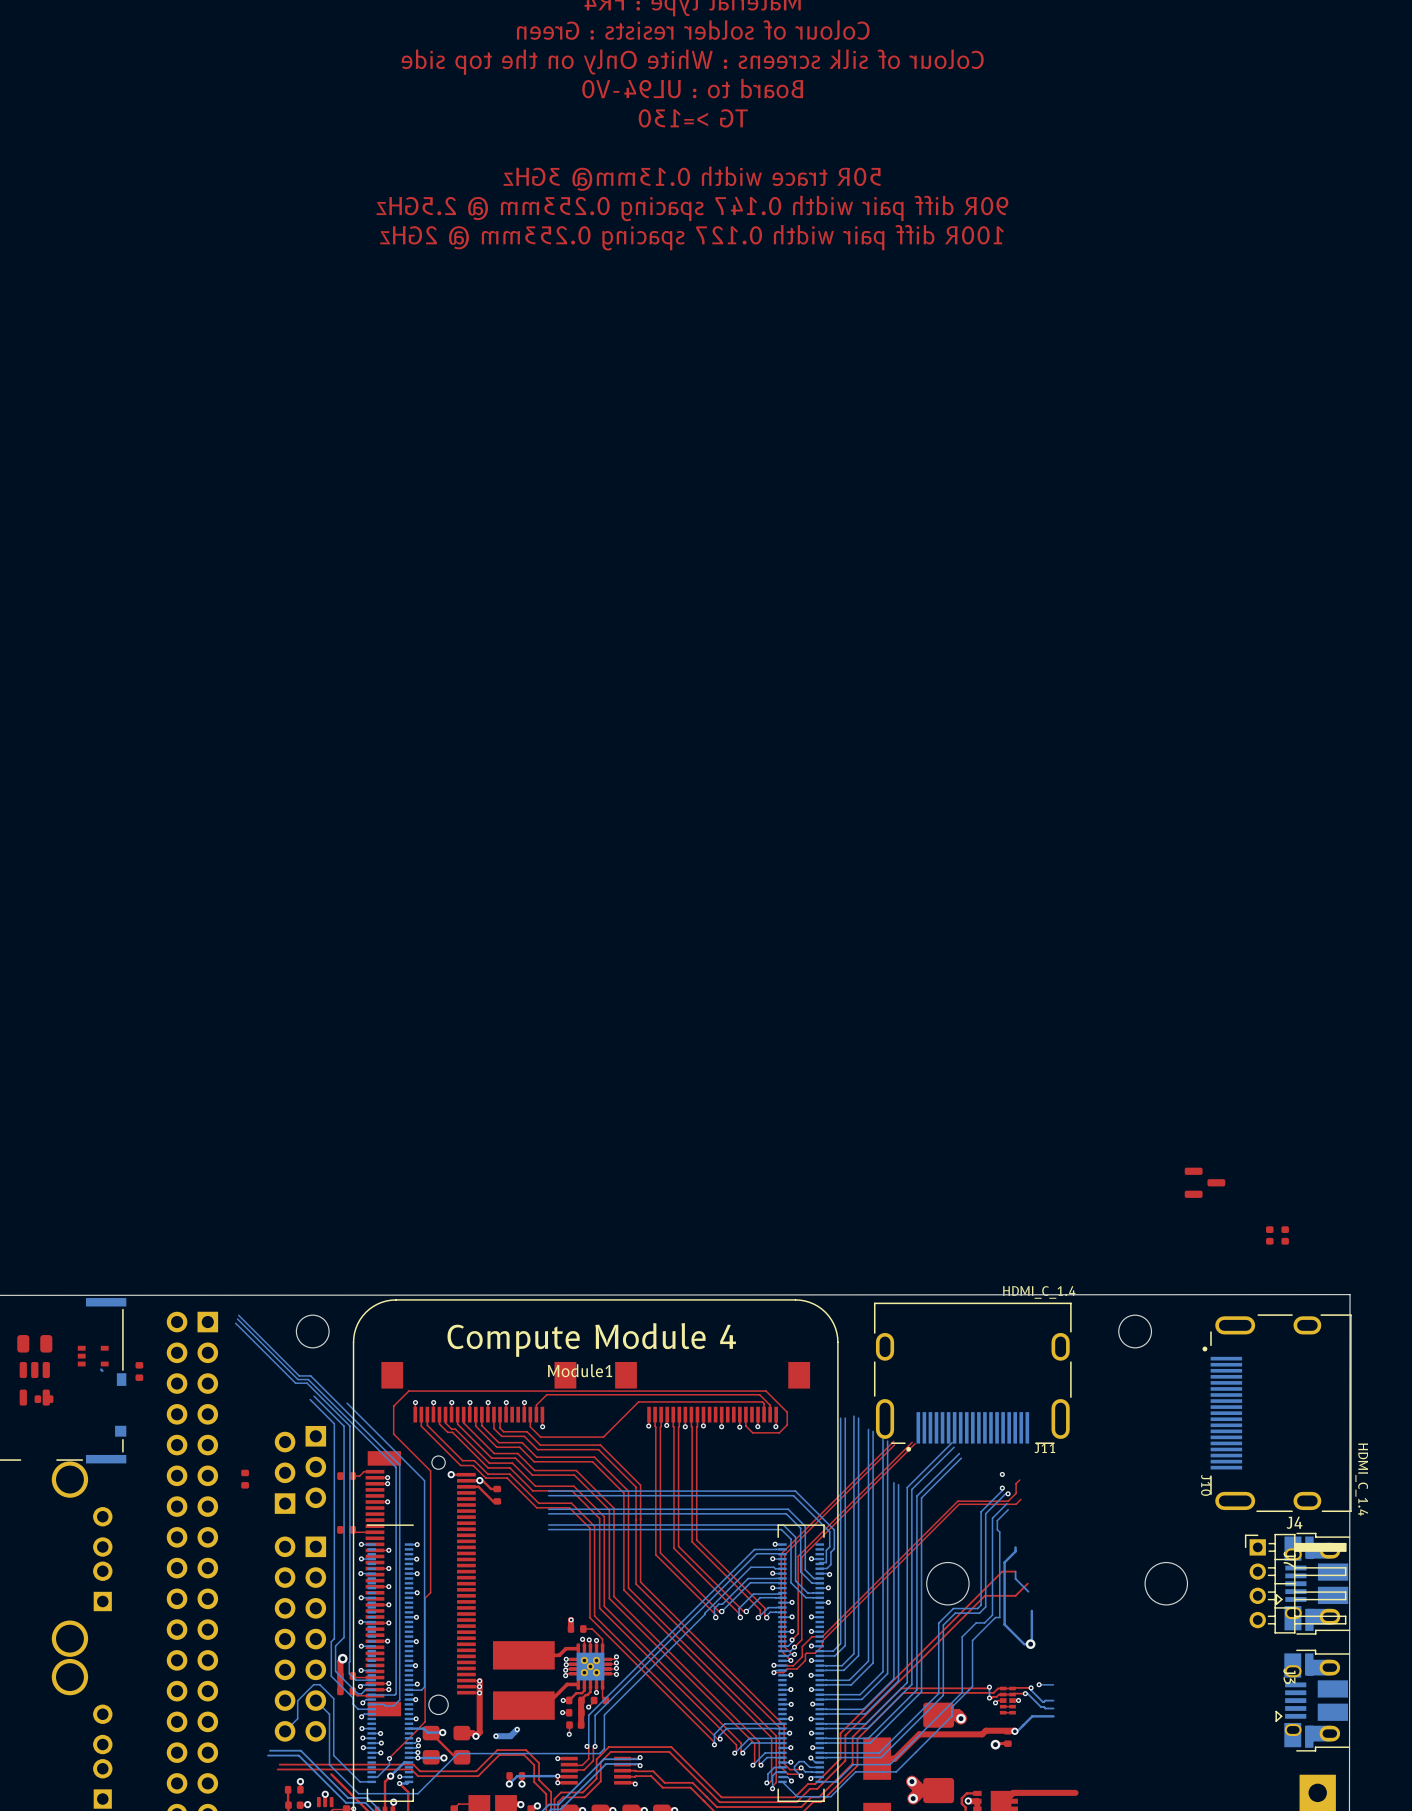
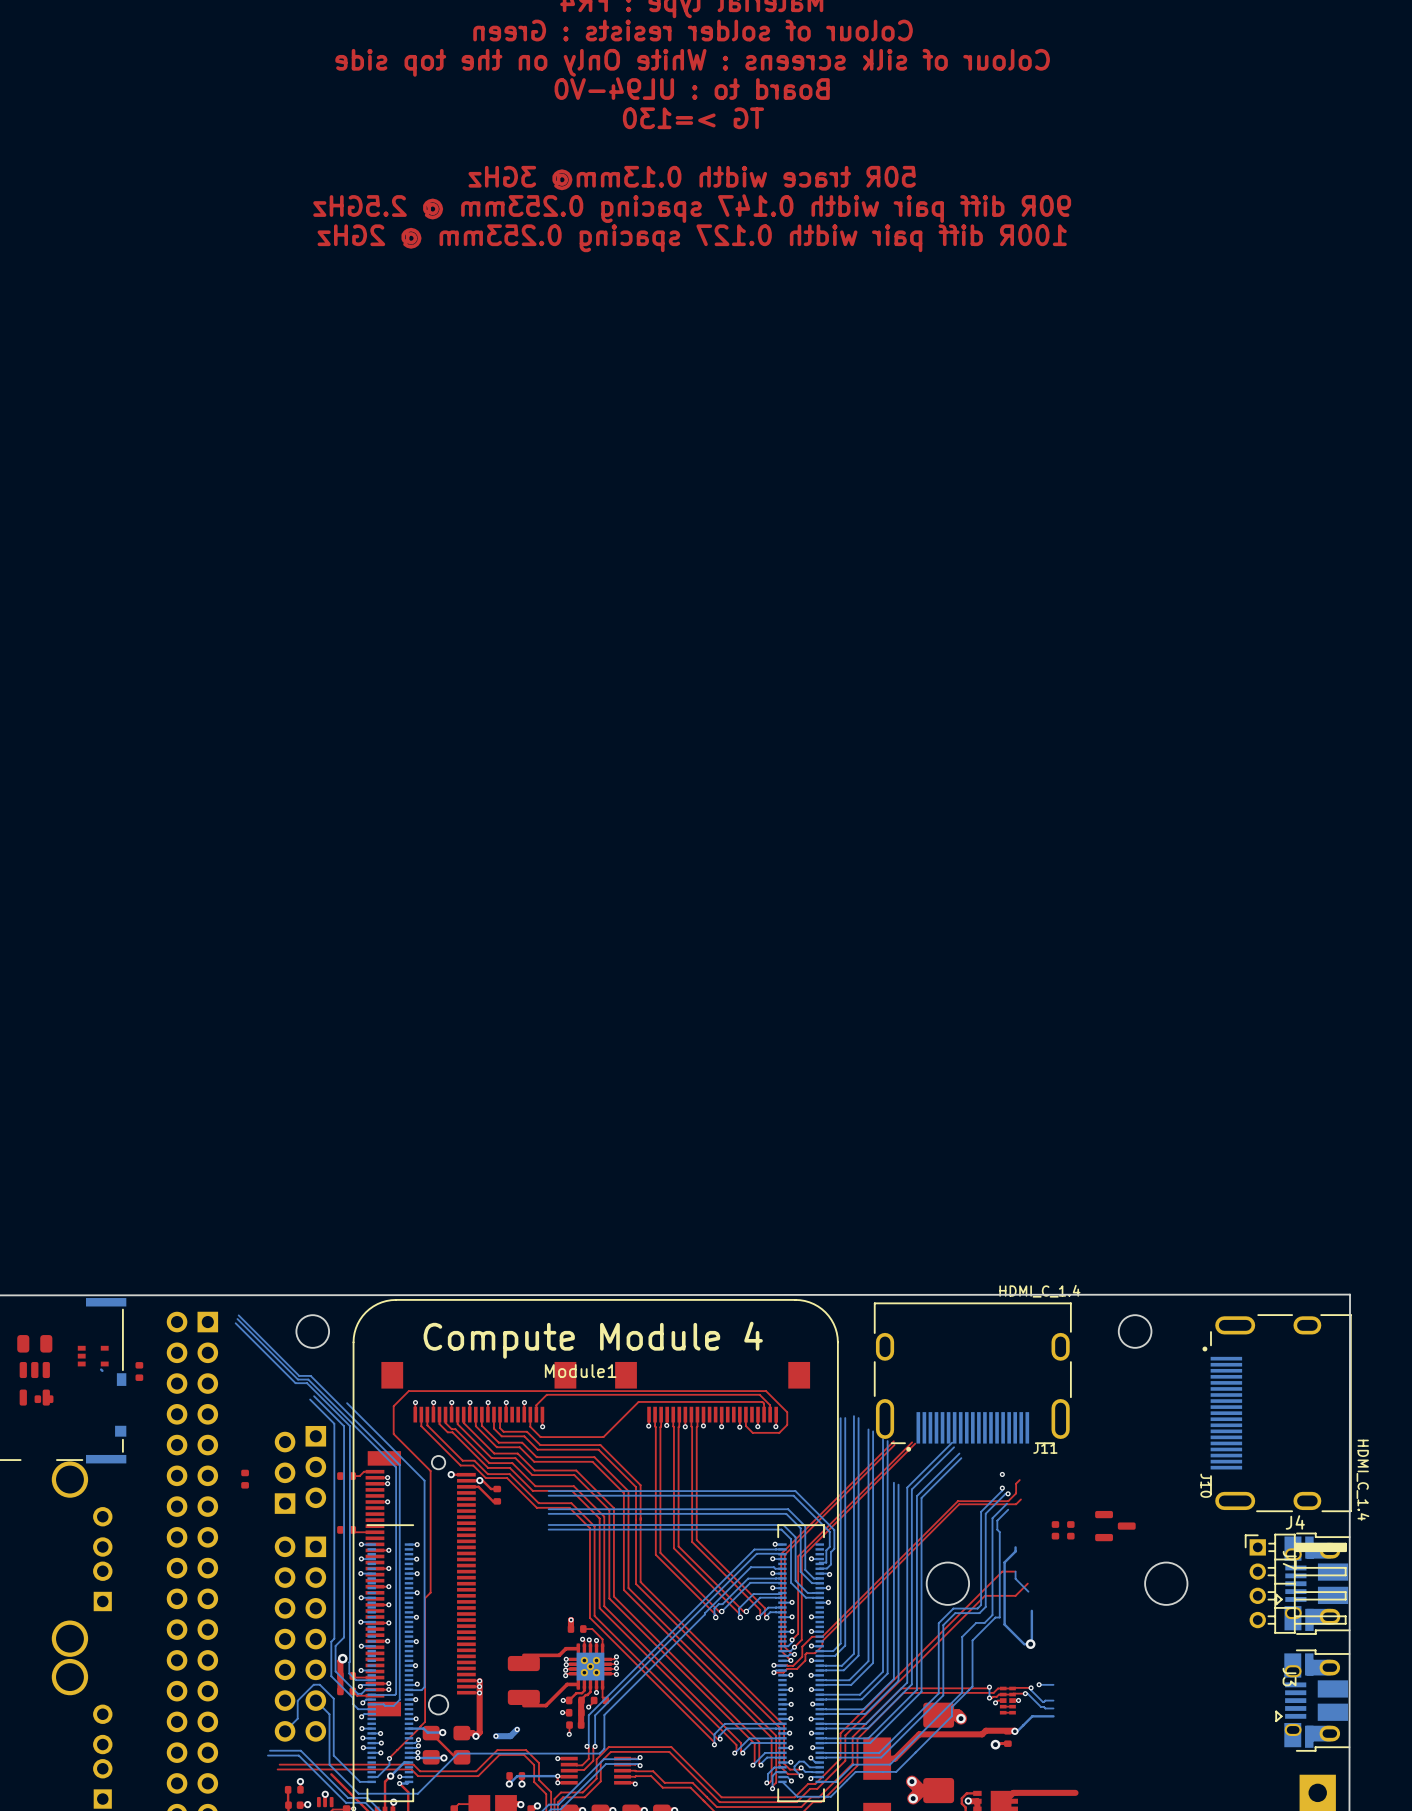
part: (1205, 1182) -> none
part: (1269, 1235) -> none
part: (1285, 1235) -> none
part: none -> (1115, 1526)
part: none -> (1055, 1530)
part: none -> (1070, 1530)
part footprint: [492, 1641, 555, 1720] -> [507, 1655, 540, 1706]

